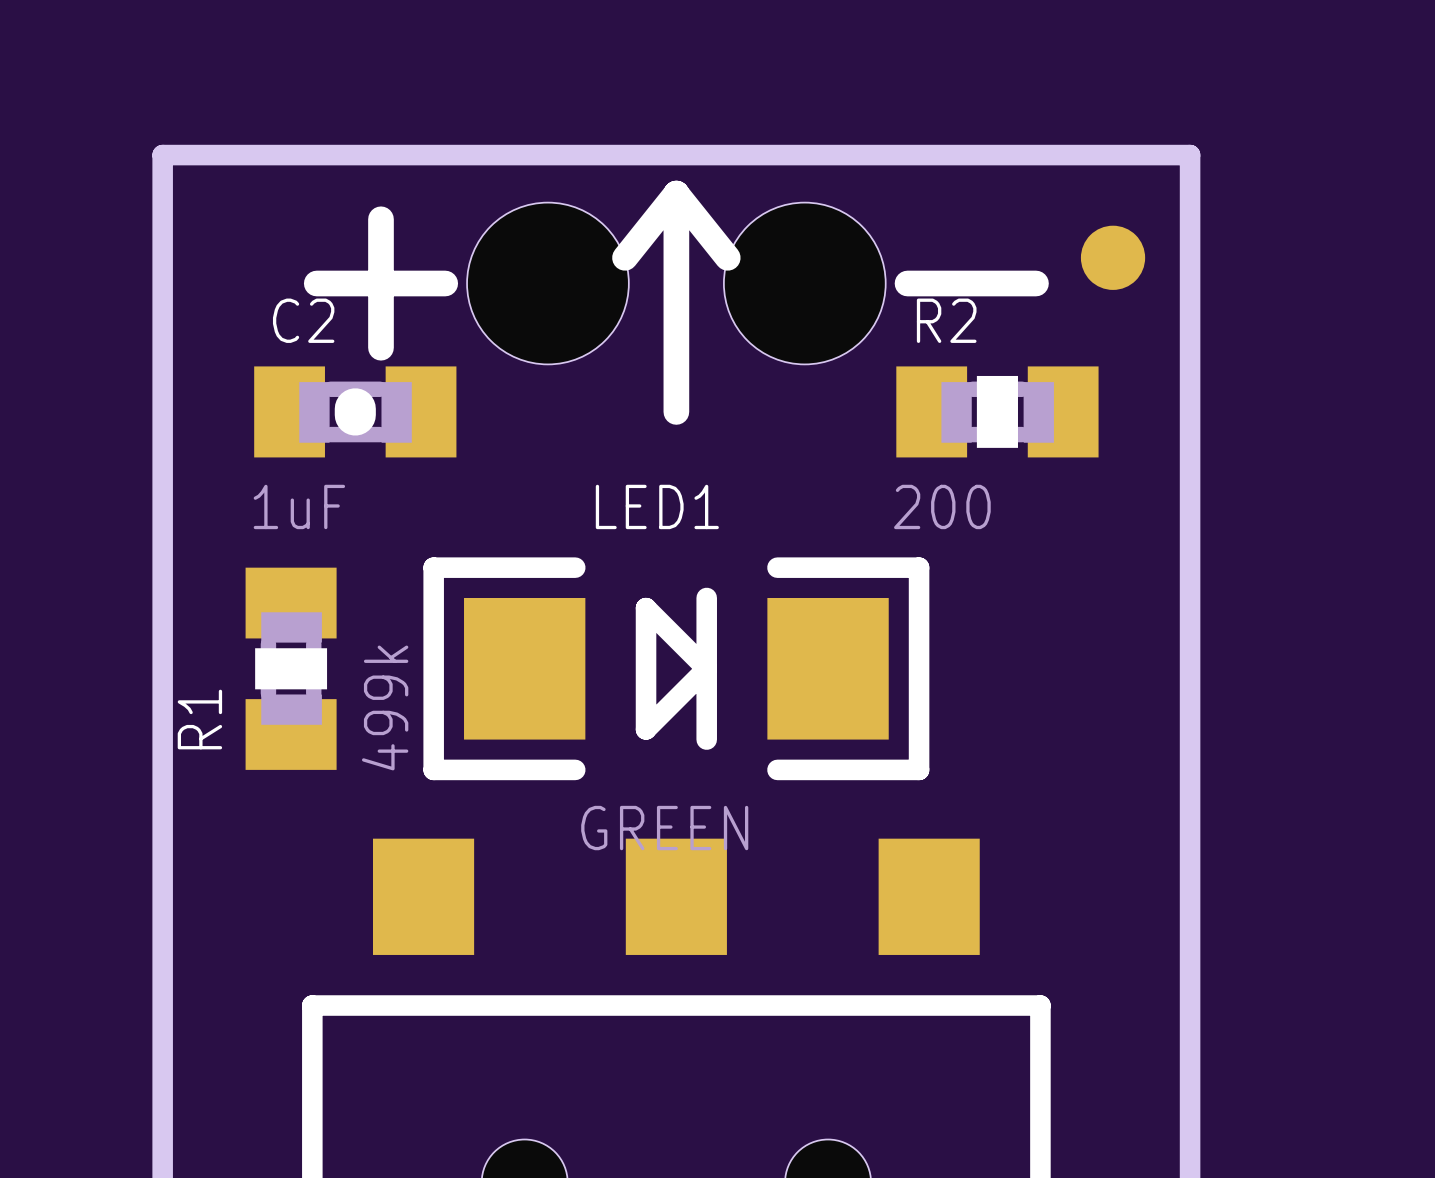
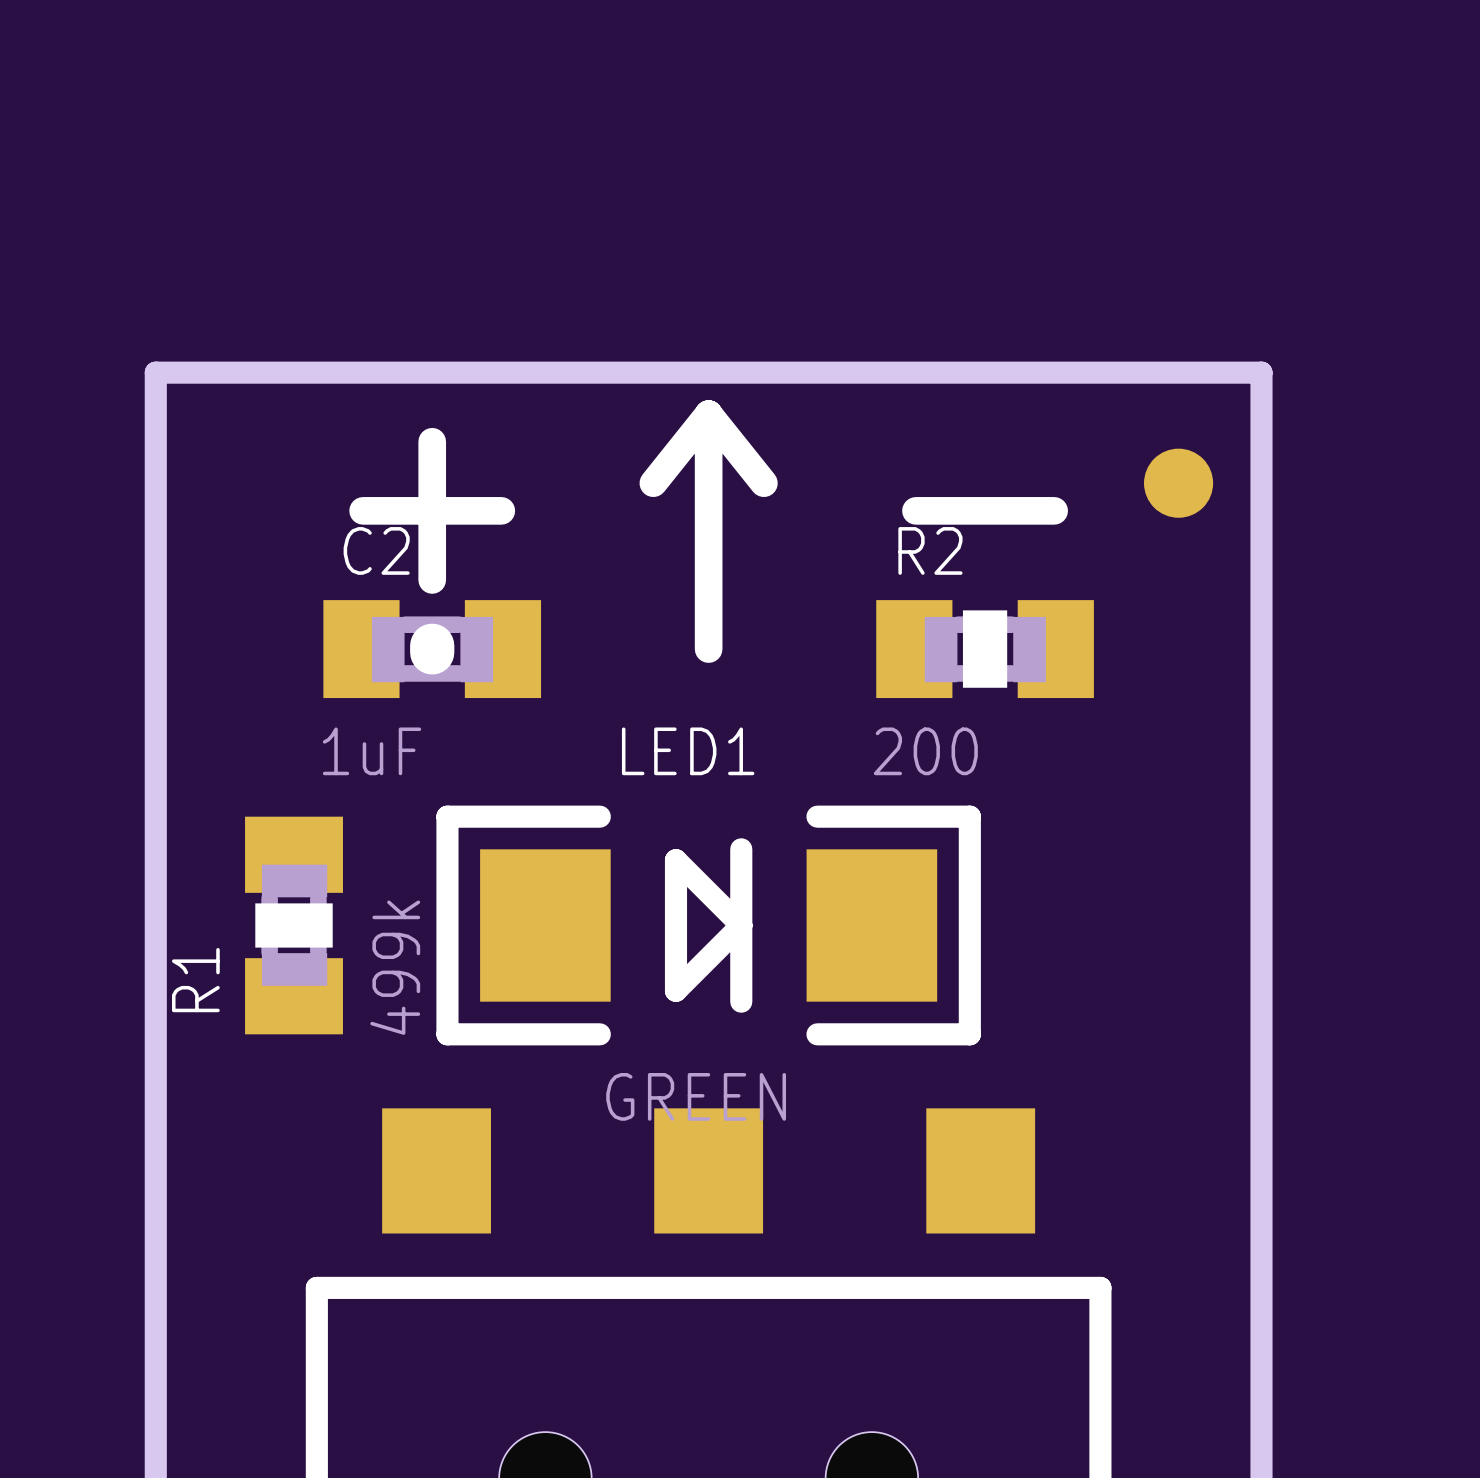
line: (380, 219) (380, 347) -> (432, 441) (432, 579)
line: (316, 283) (355, 283) -> (459, 510) (501, 510)
part: (676, 283) -> none
line: (997, 283) (1035, 283) -> (915, 510) (957, 510)
C2 position: (355, 411) -> (432, 649)
R2 position: (997, 411) -> (985, 649)

